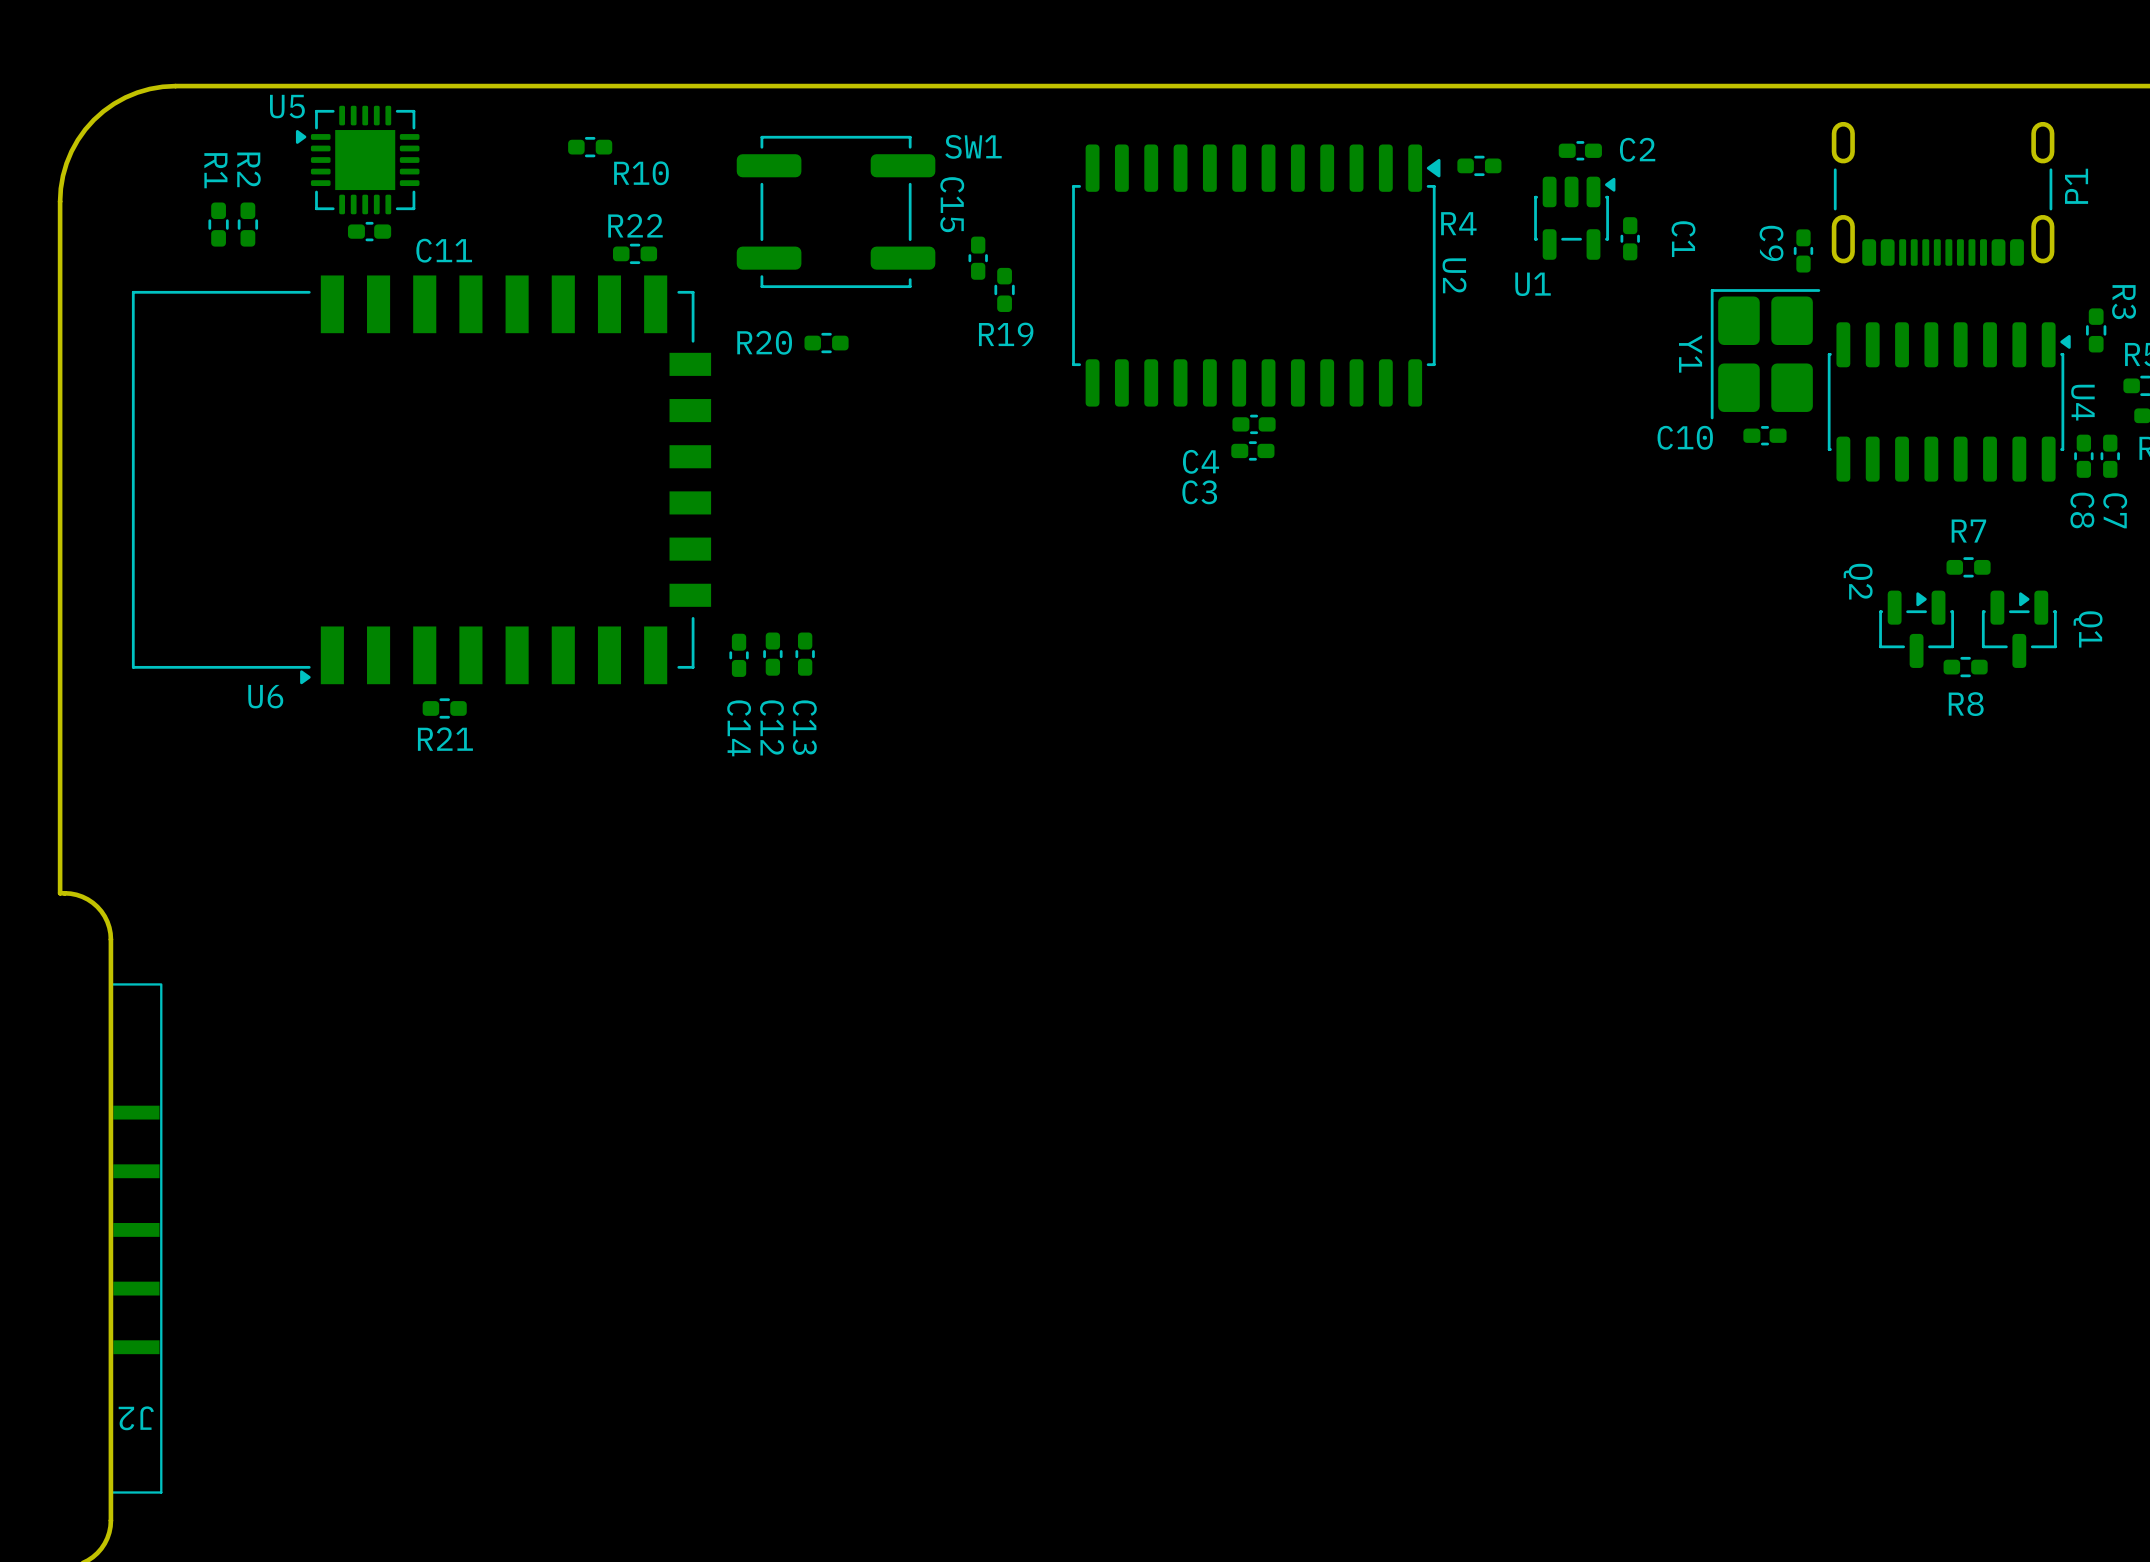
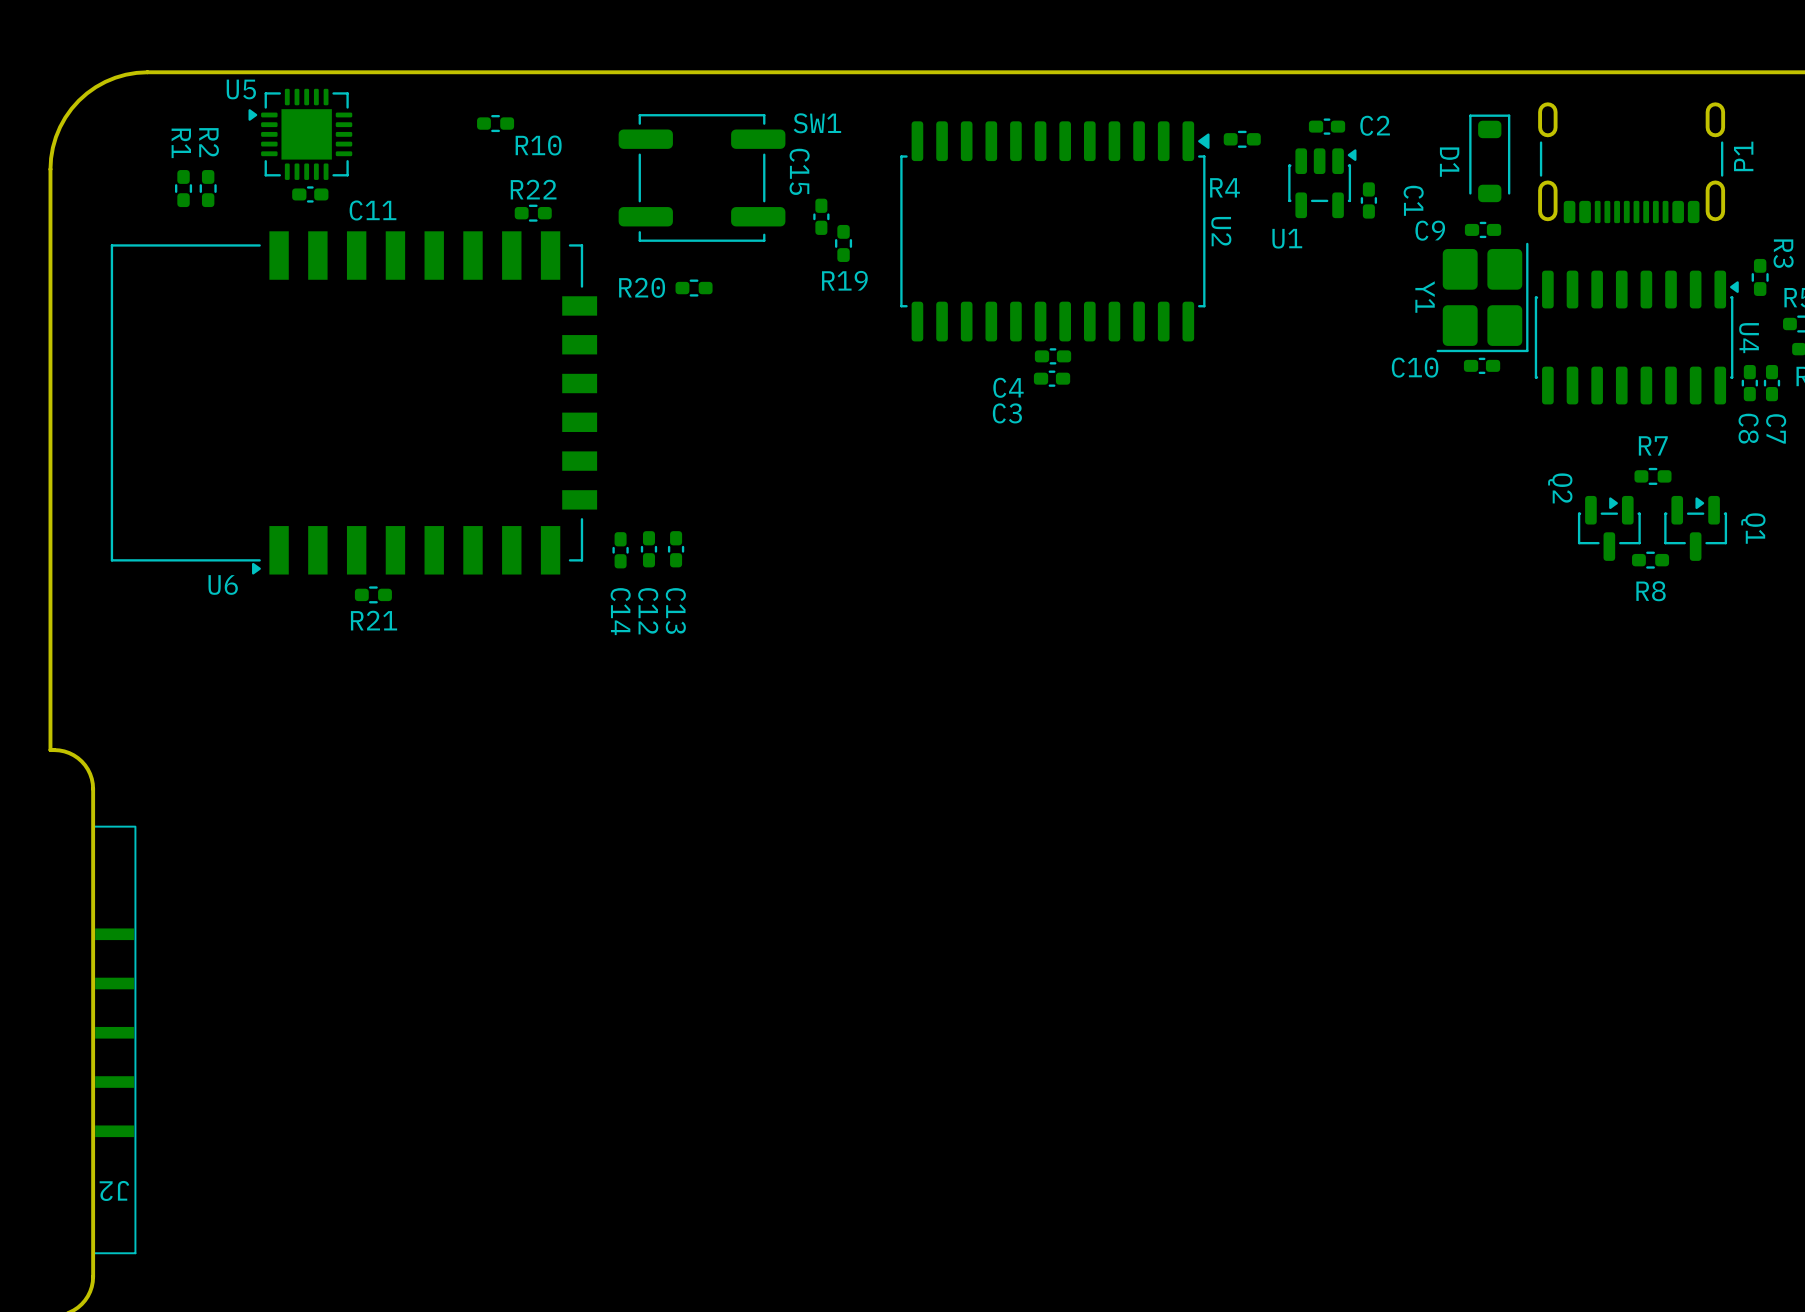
D1: none -> (1489, 158)
C9 rotation: 0° (1803, 250) -> 90° clockwise (1483, 229)
C9 position: (1803, 250) -> (1483, 229)
Y1 rotation: 0° (1765, 354) -> 180° (1482, 297)

